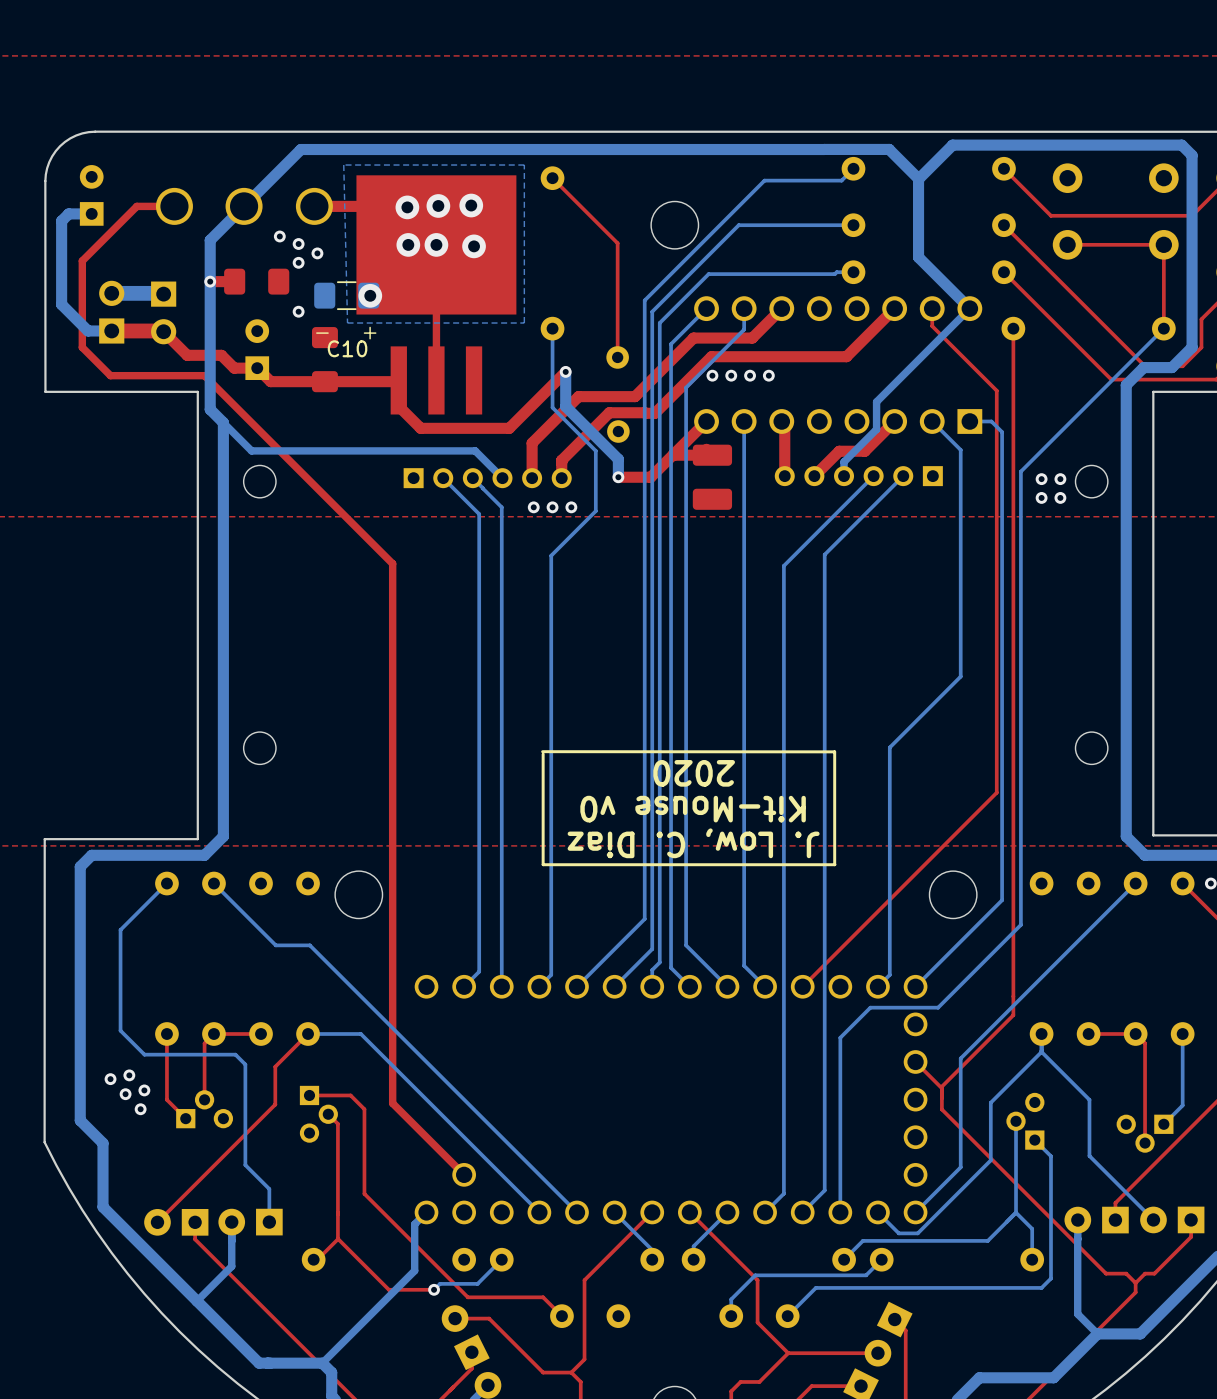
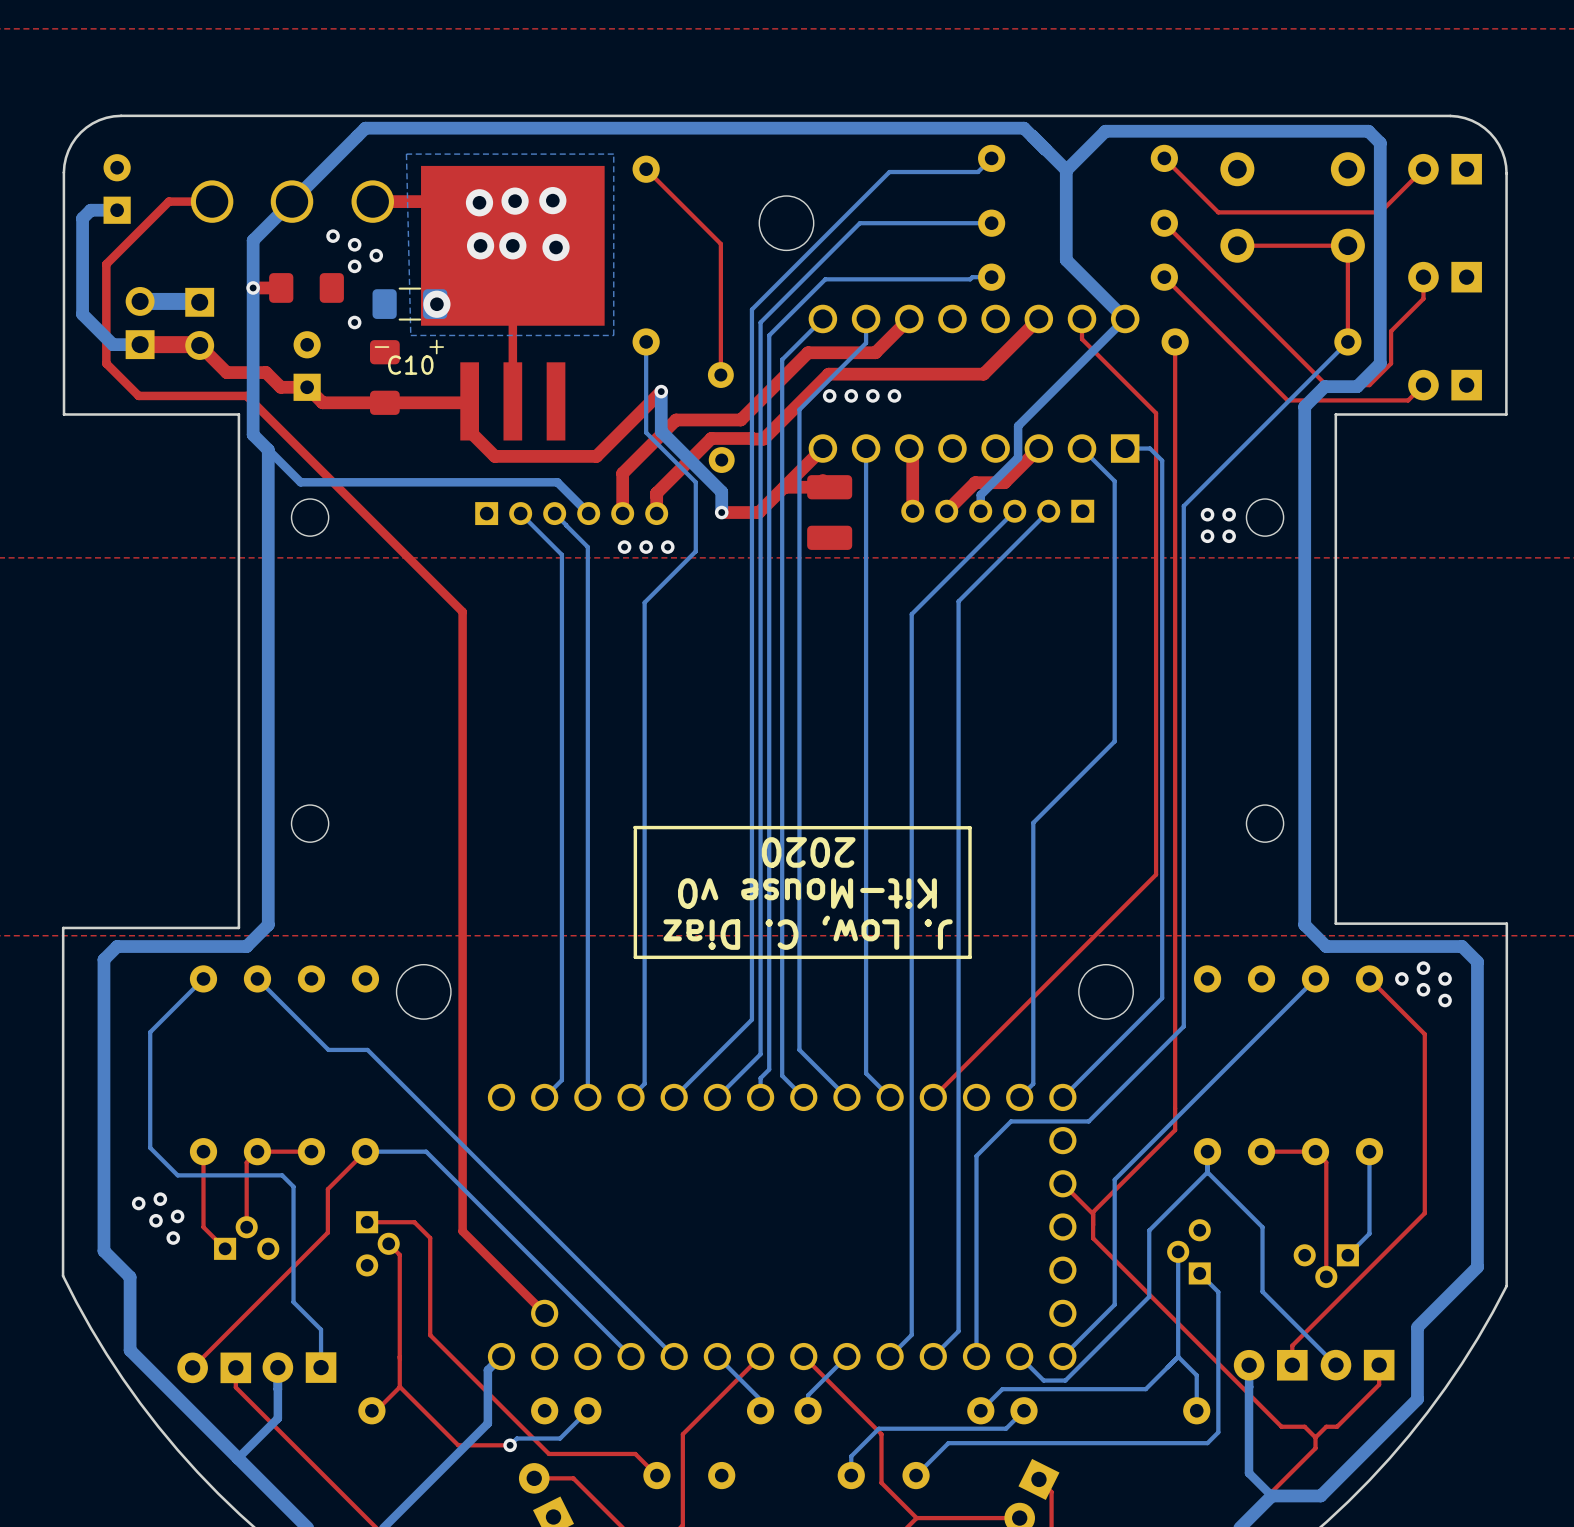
bottom track: (824, 149) (300, 149) -> (1045, 149) (1024, 128) (365, 128) (357, 136)
bottom track: (889, 149) (824, 149) -> none

